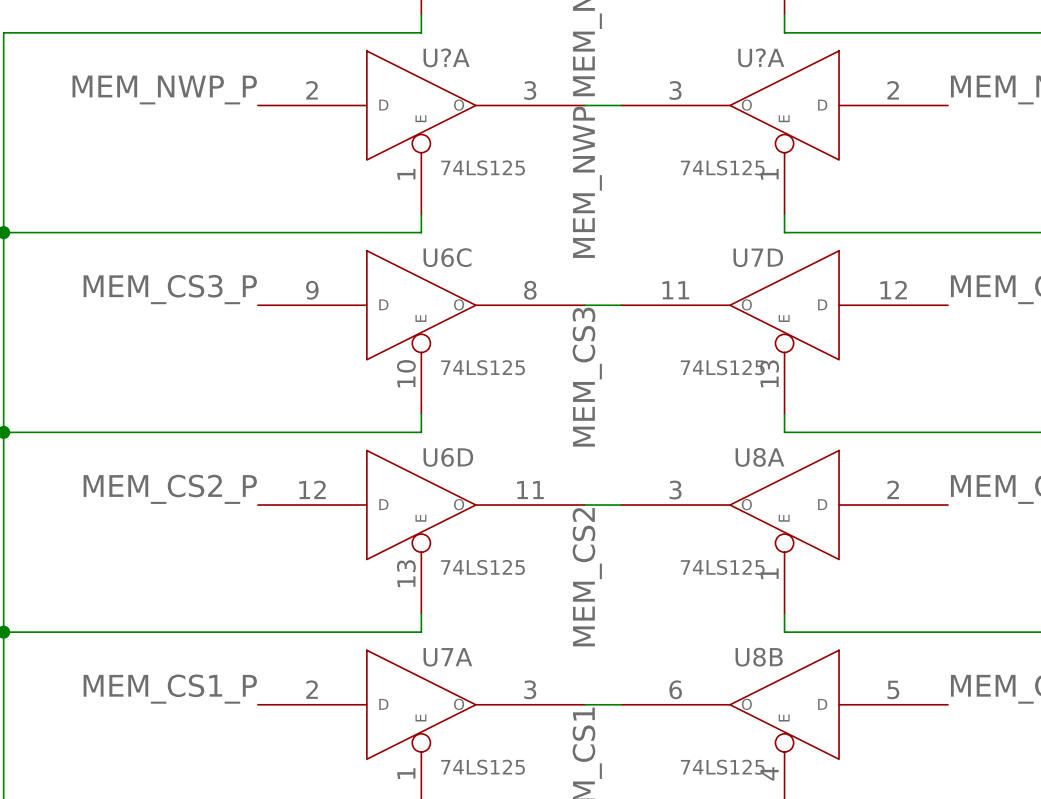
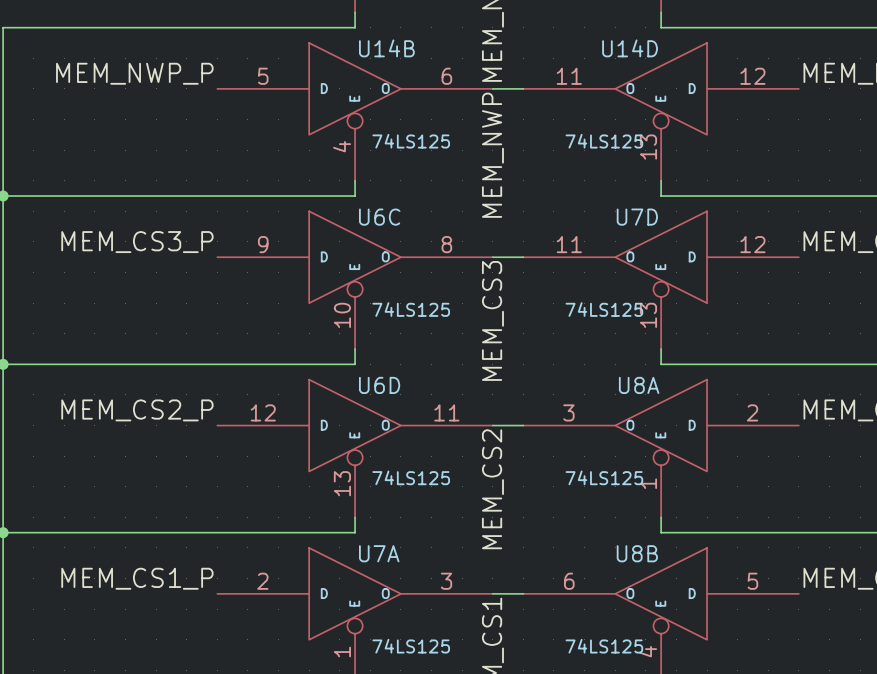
U?A name: U?A (446, 57) -> U14B (386, 48)
U?A name: U?A (761, 57) -> U14D (630, 48)
U?A pin number: 2 (312, 90) -> 5 (263, 76)
U?A pin number: 3 (530, 90) -> 6 (446, 76)
U?A pin number: 3 (675, 90) -> 11 (569, 76)
U?A pin number: 2 (893, 90) -> 12 (752, 76)
U?A pin number: 1 (406, 174) -> 4 (342, 146)
U?A pin number: 1 (769, 174) -> 13 (648, 147)

